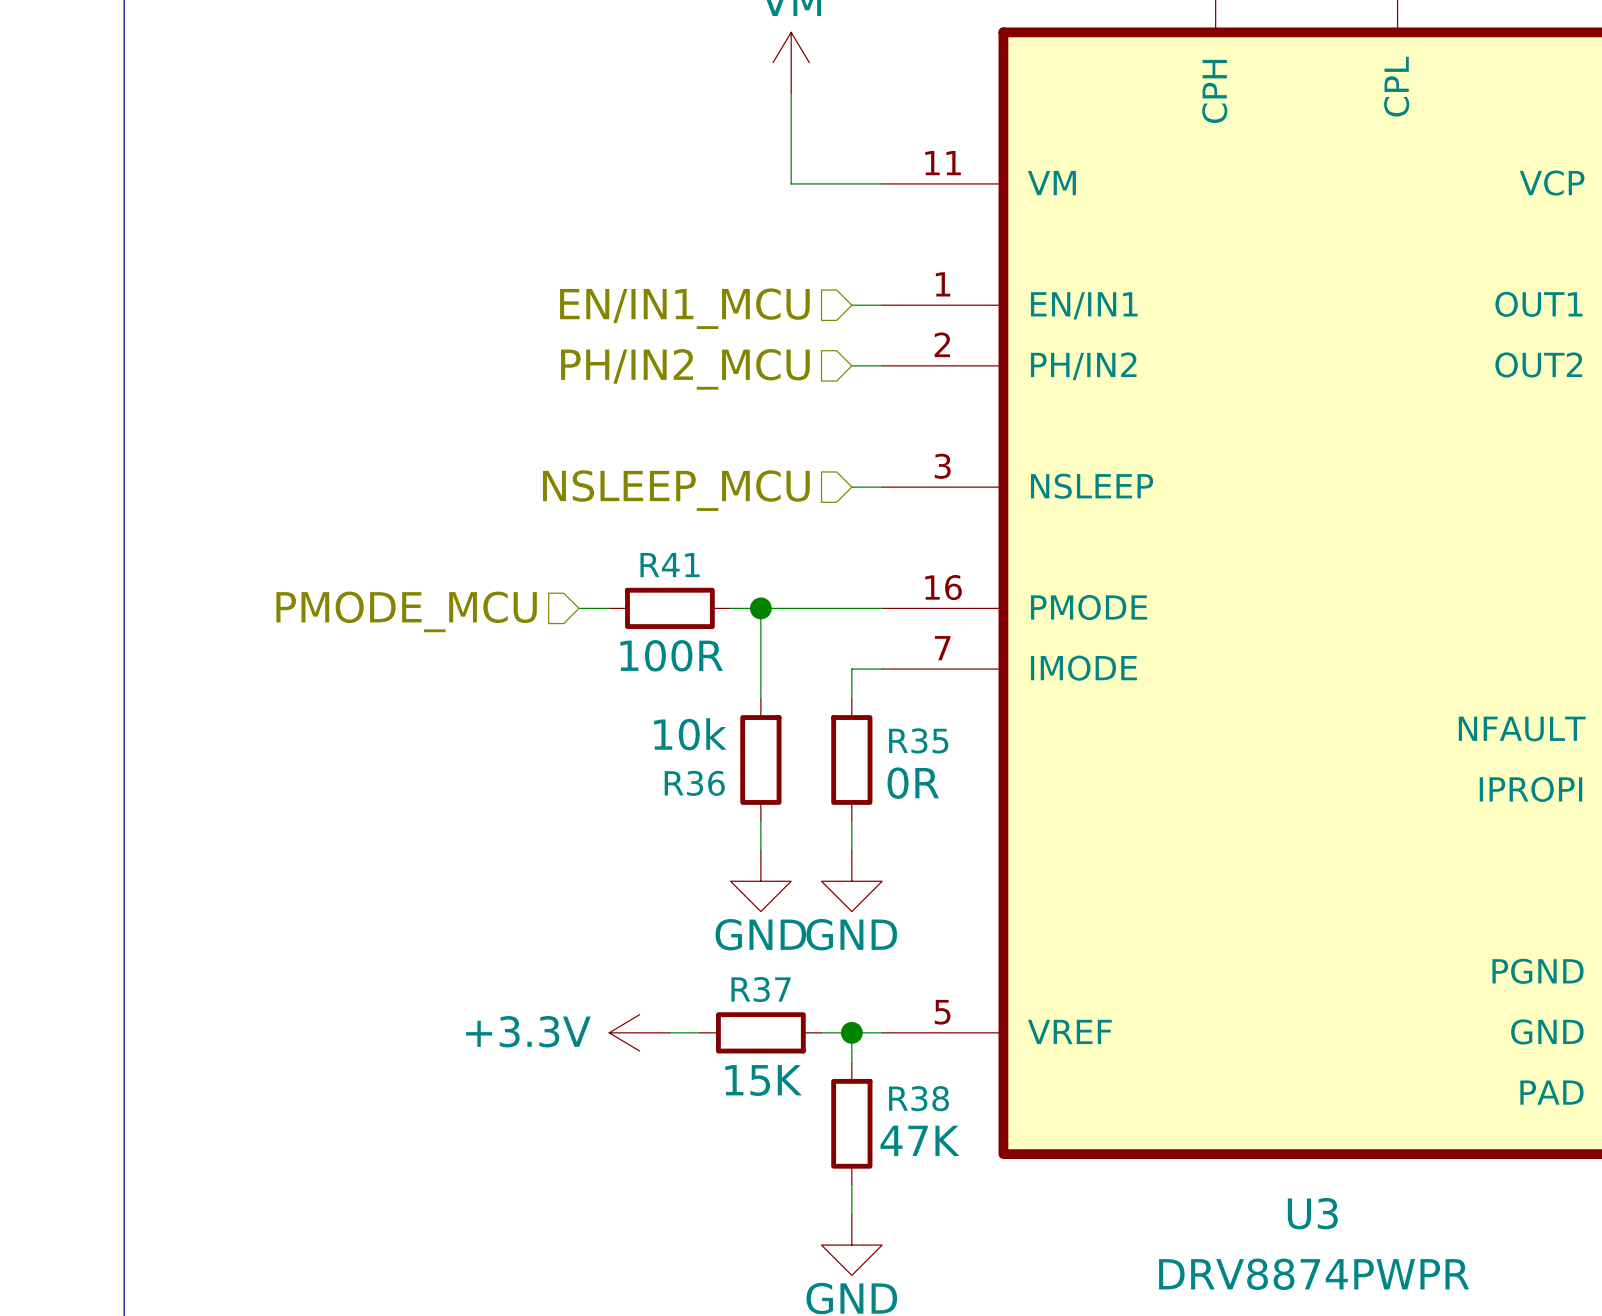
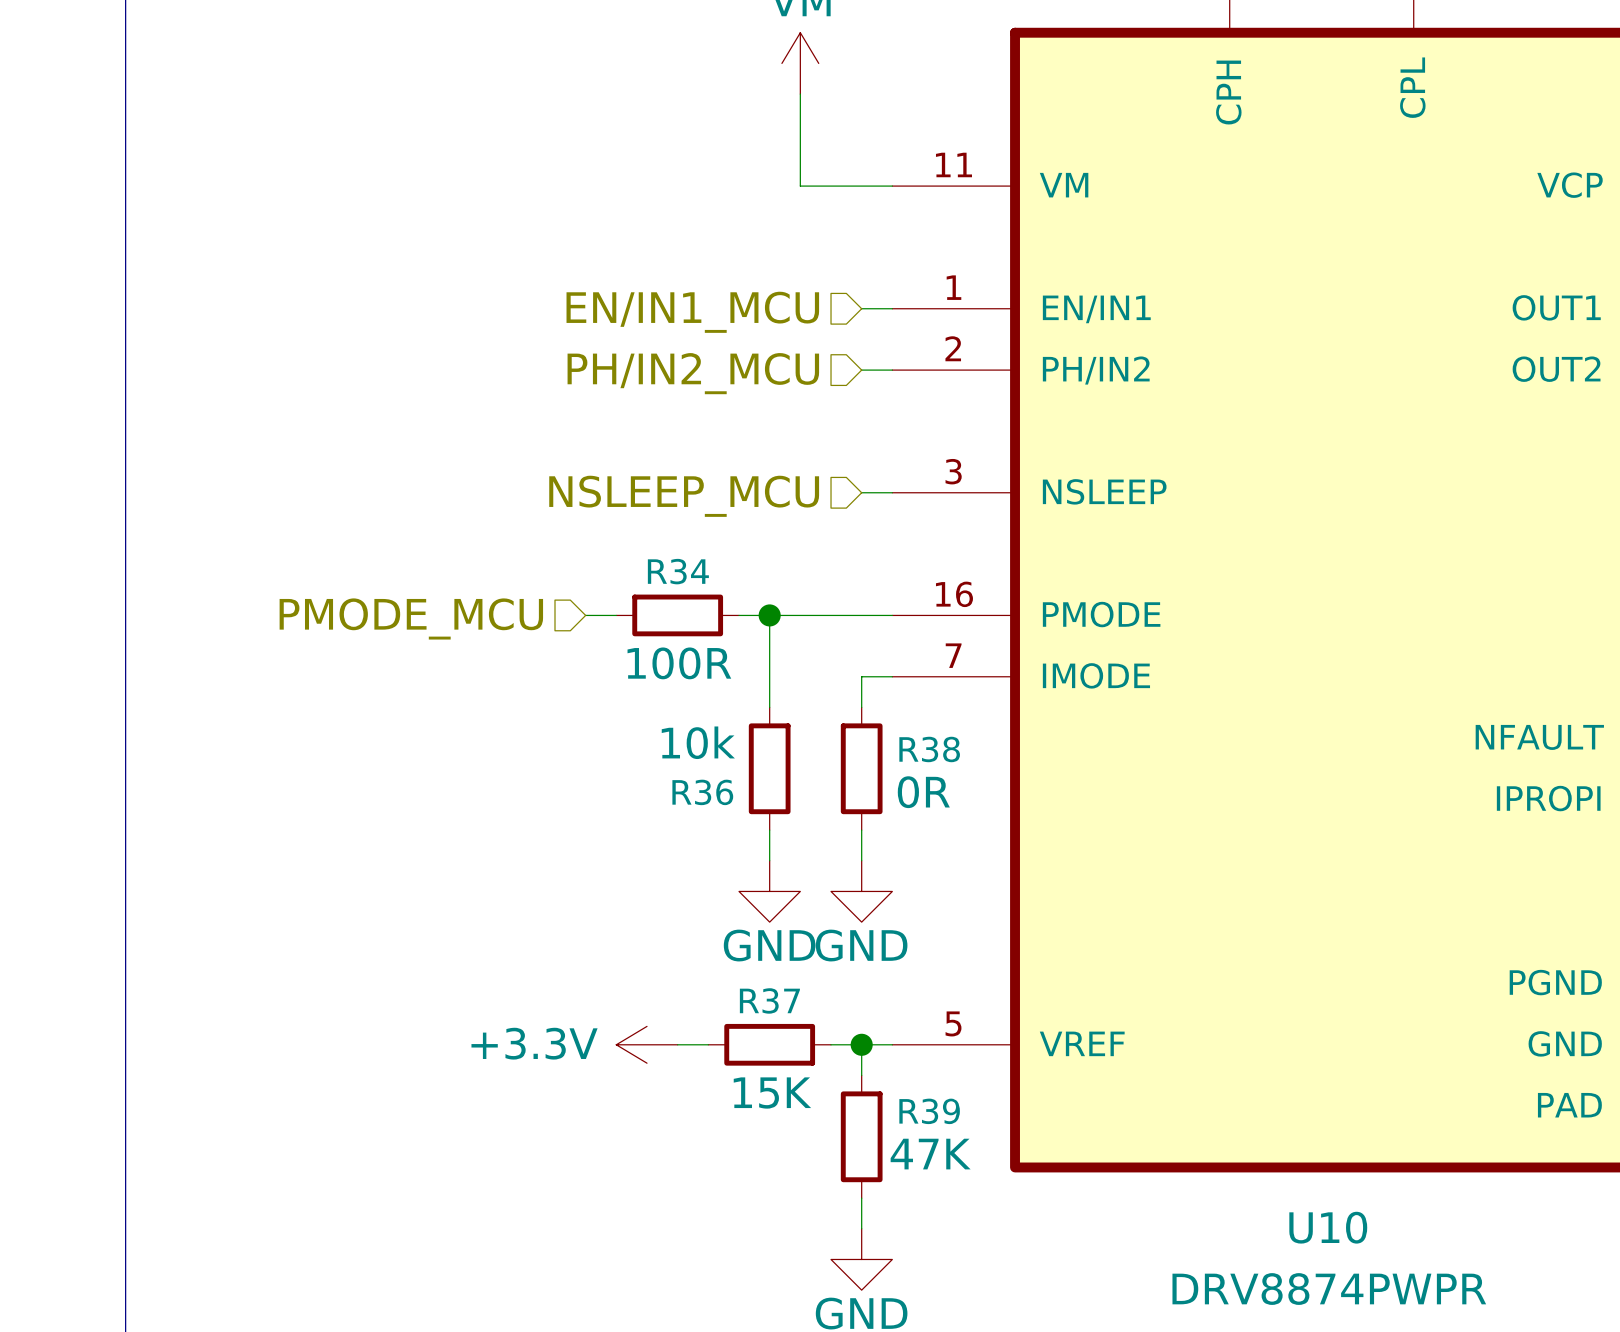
R41 name: R41 (670, 565) -> R34 (678, 571)
R35 name: R35 (918, 740) -> R38 (929, 749)
R38 name: R38 (919, 1098) -> R39 (929, 1111)
U3 name: U3 (1312, 1213) -> U10 (1328, 1227)

